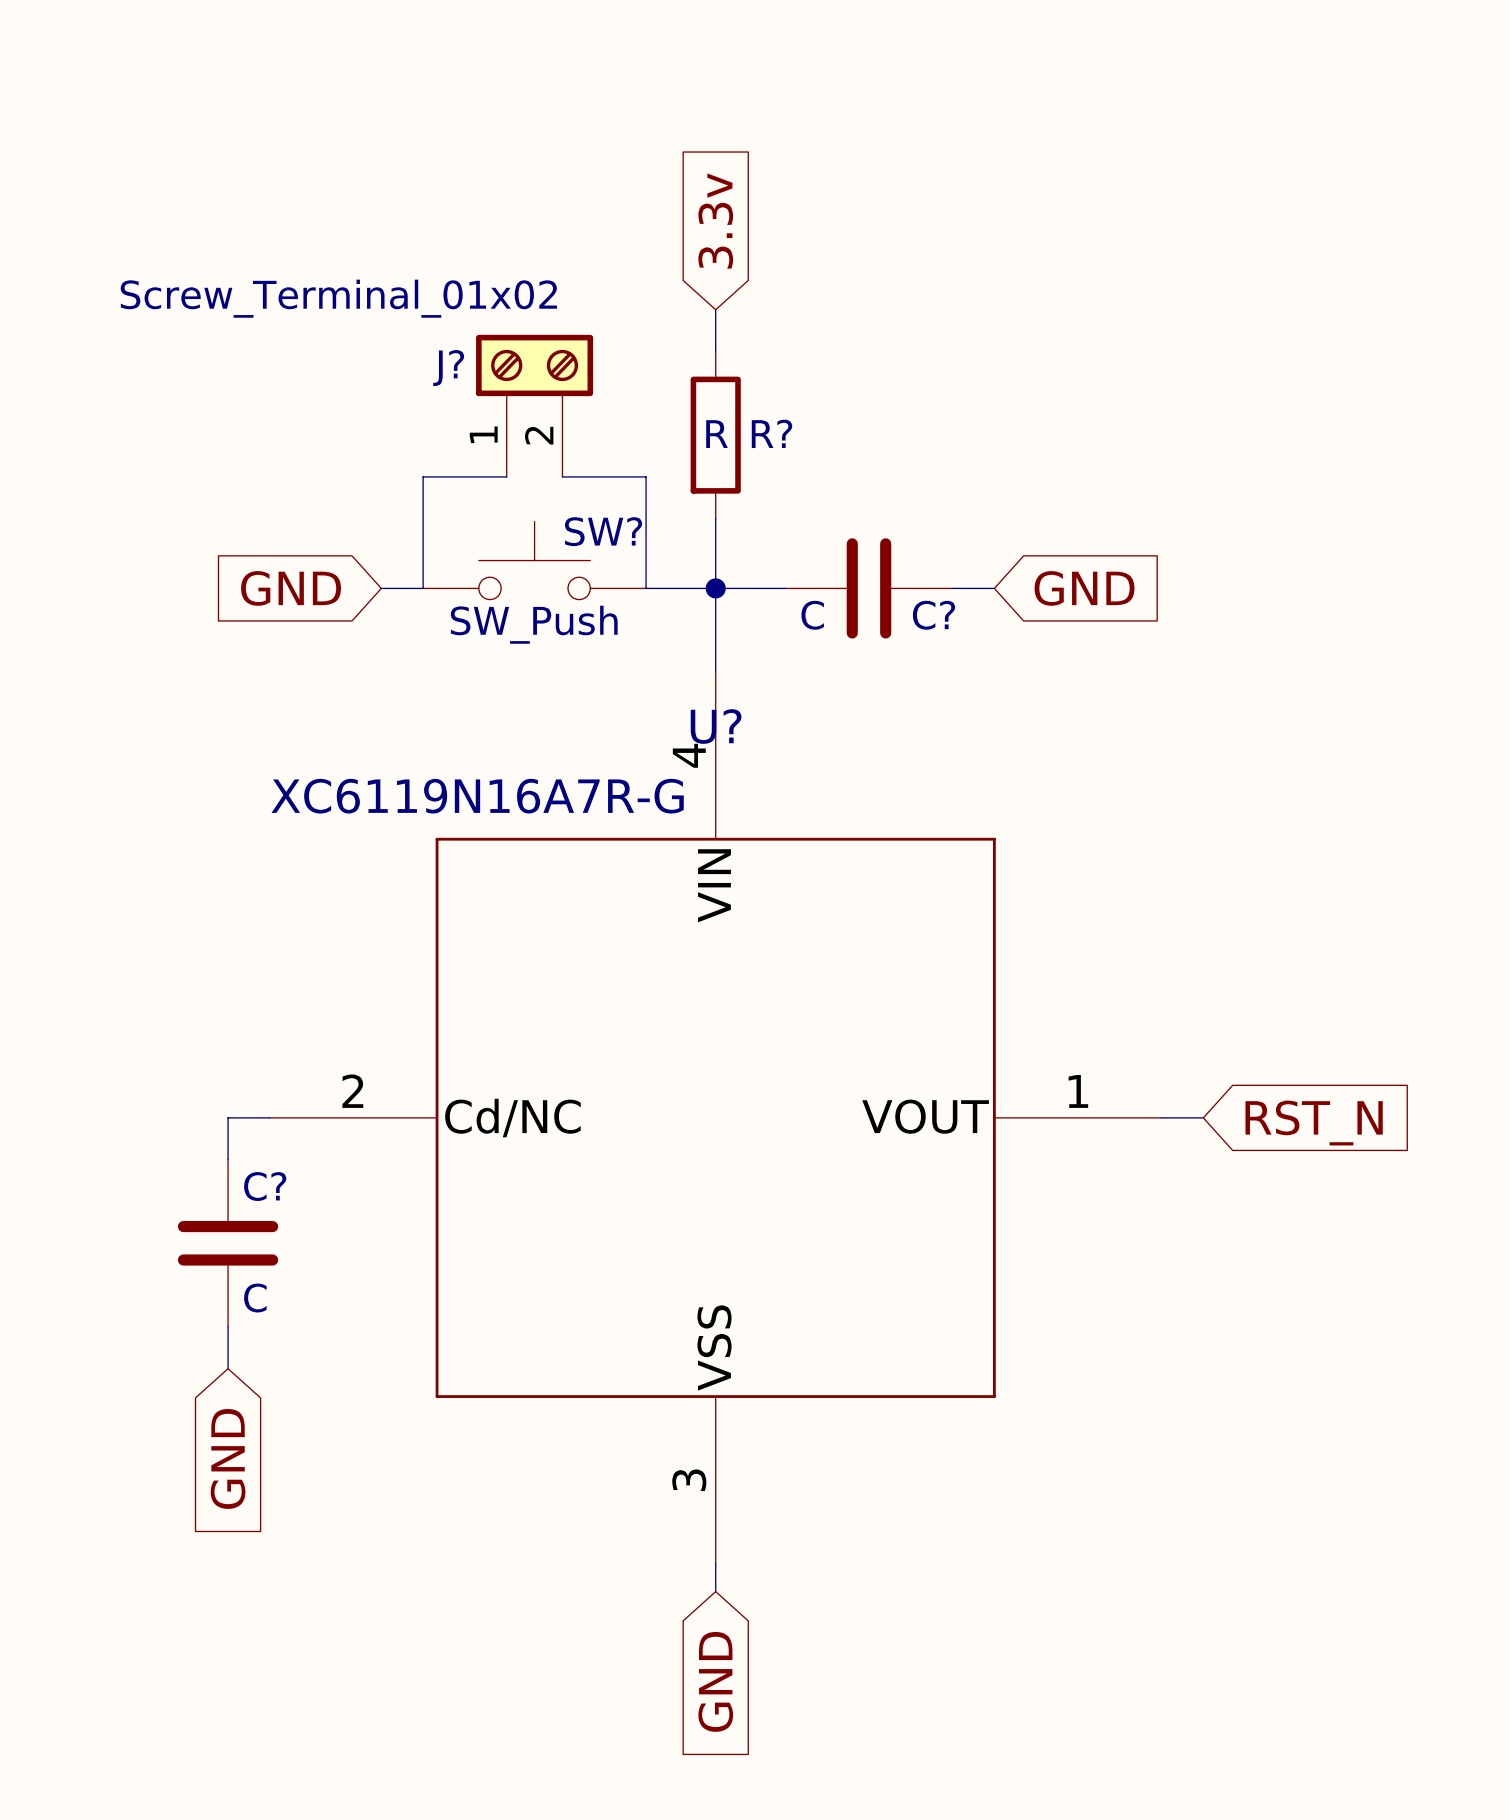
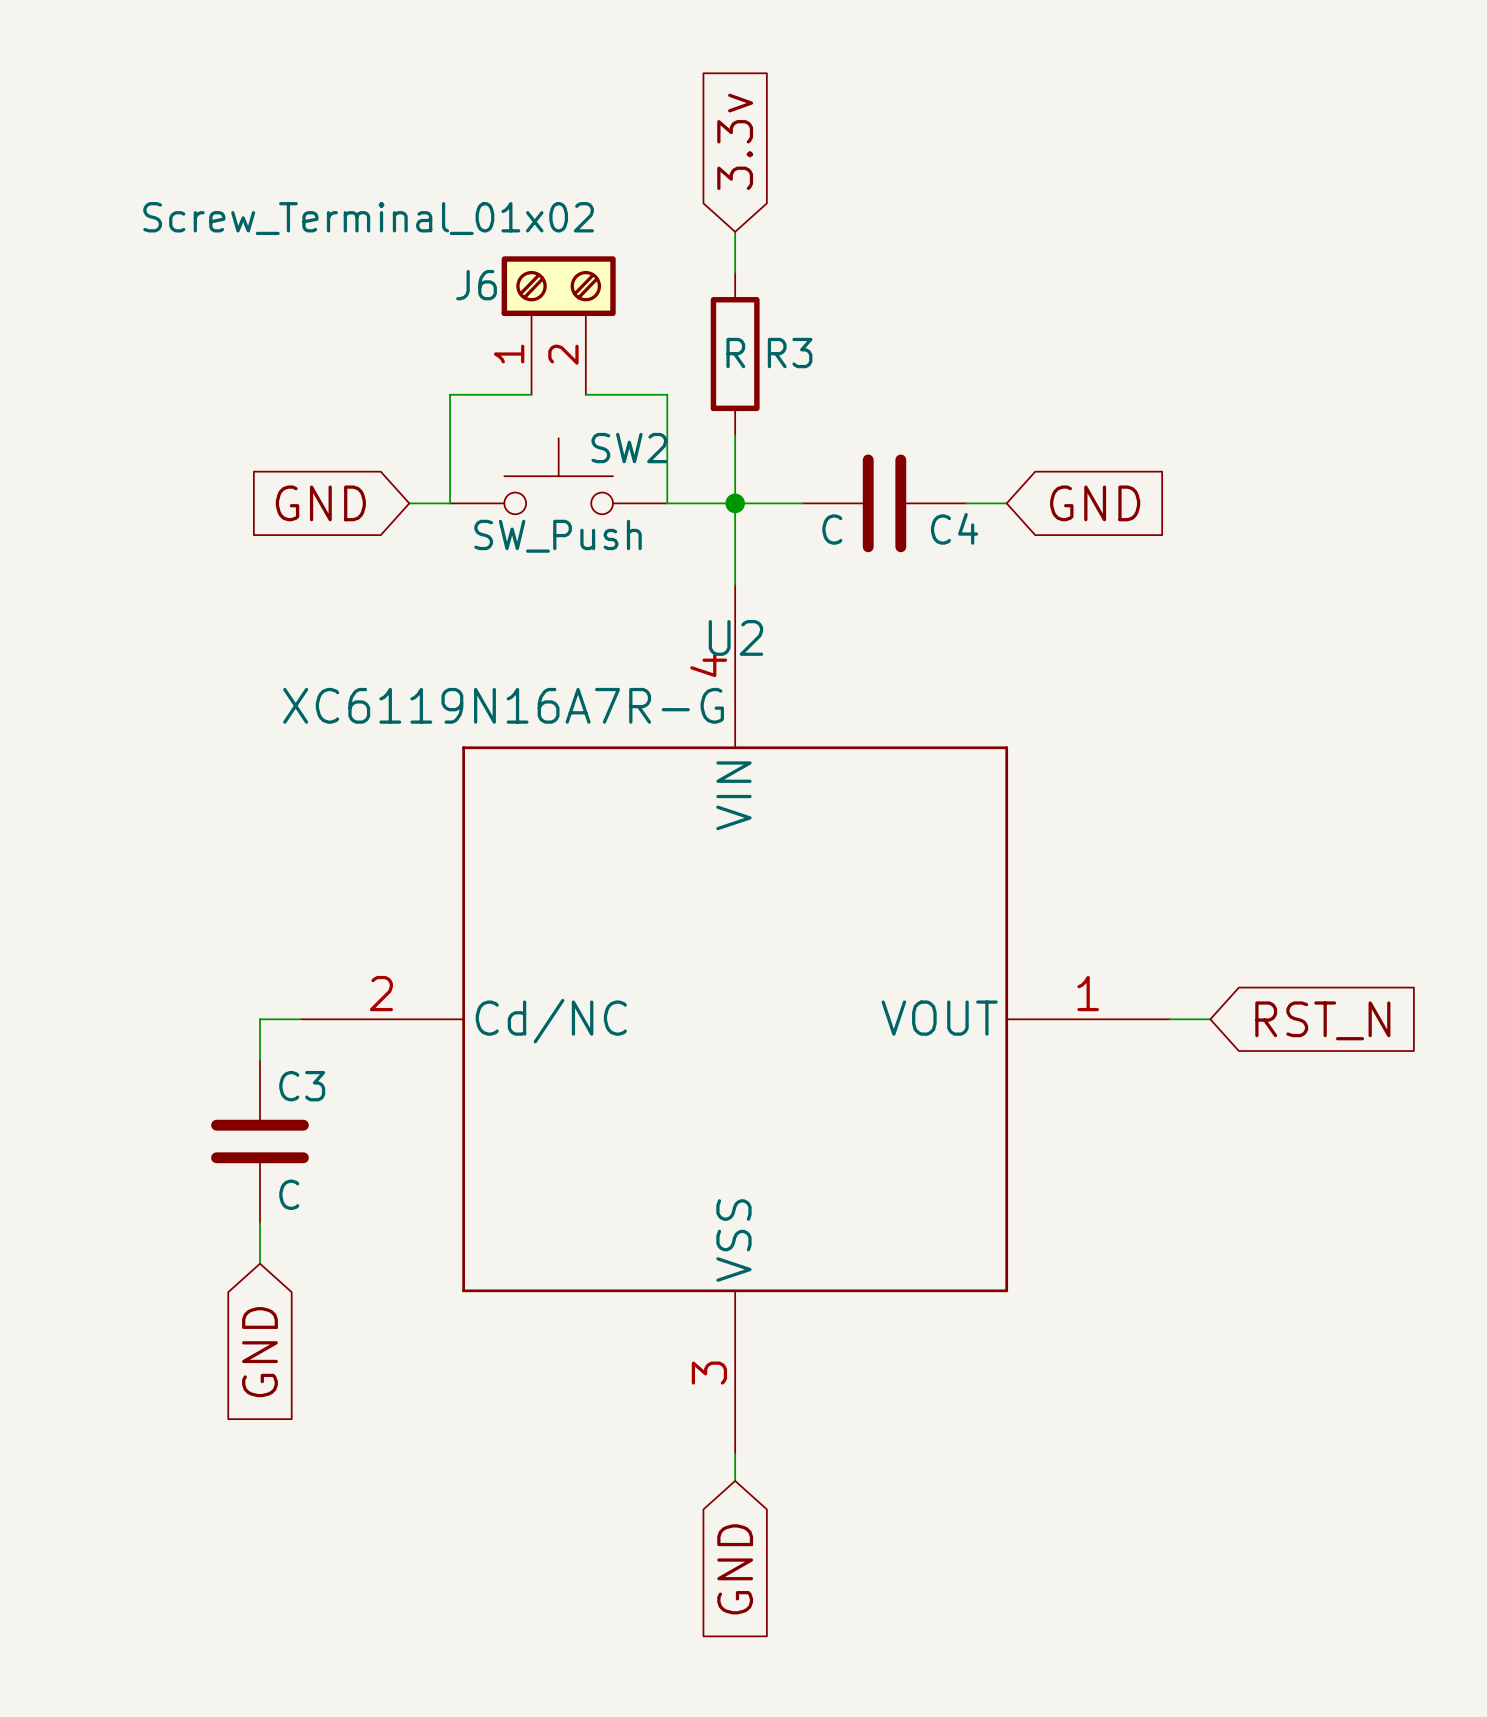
J? name: J? (448, 368) -> J6 (476, 285)
R? name: R? (771, 433) -> R3 (790, 353)
SW? name: SW? (603, 531) -> SW2 (629, 448)
C? name: C? (934, 615) -> C4 (954, 528)
U? name: U? (716, 726) -> U2 (735, 637)
C? name: C? (265, 1186) -> C3 (302, 1086)

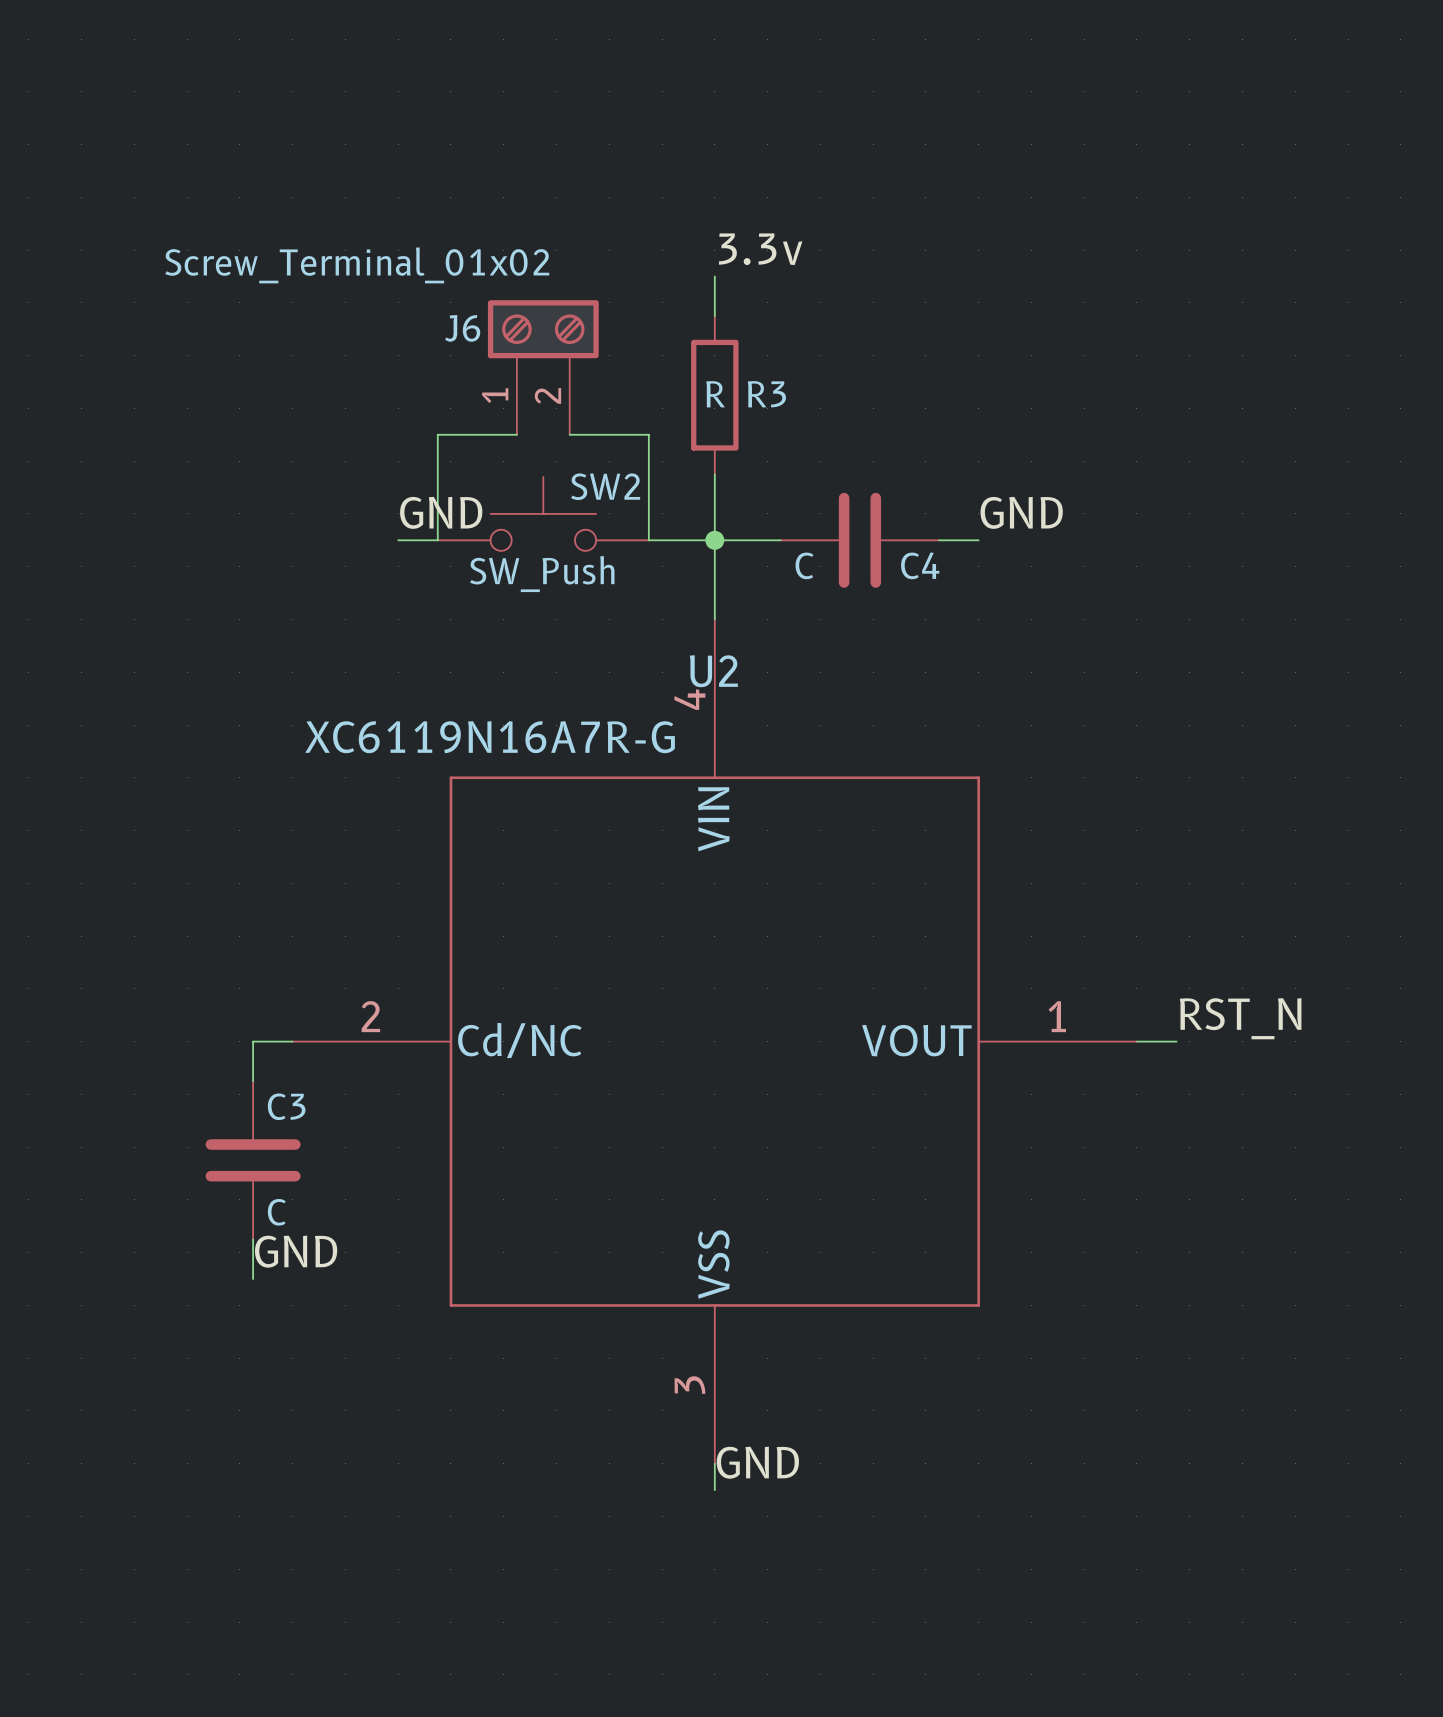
global label: 3.3v (735, 141) -> none
label: none -> 3.3v (760, 249)
label: none -> GND (441, 512)
label: none -> GND (1021, 512)
global label: GND (320, 503) -> none
global label: GND (1095, 503) -> none
label: none -> RST_N (1240, 1018)
global label: RST_N (1322, 1020) -> none
label: none -> GND (296, 1251)
global label: GND (259, 1352) -> none
label: none -> GND (757, 1462)
global label: GND (735, 1569) -> none

